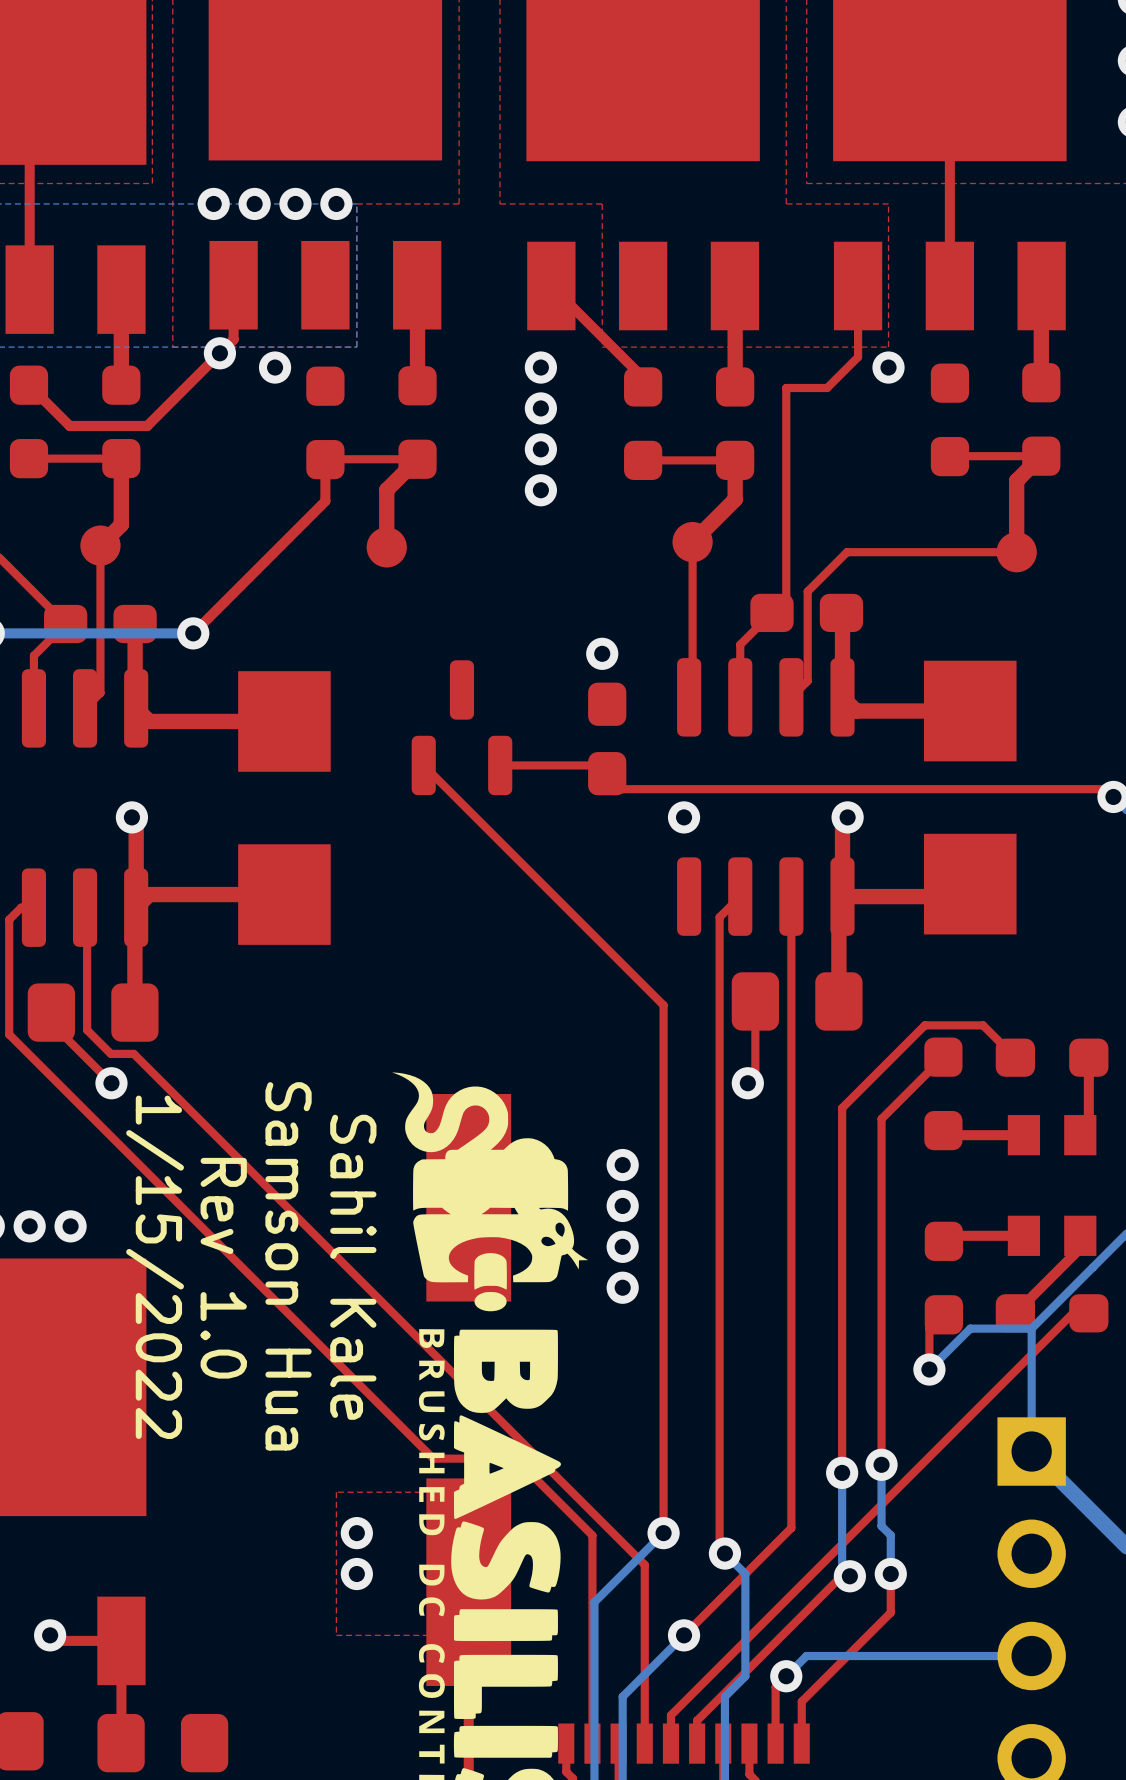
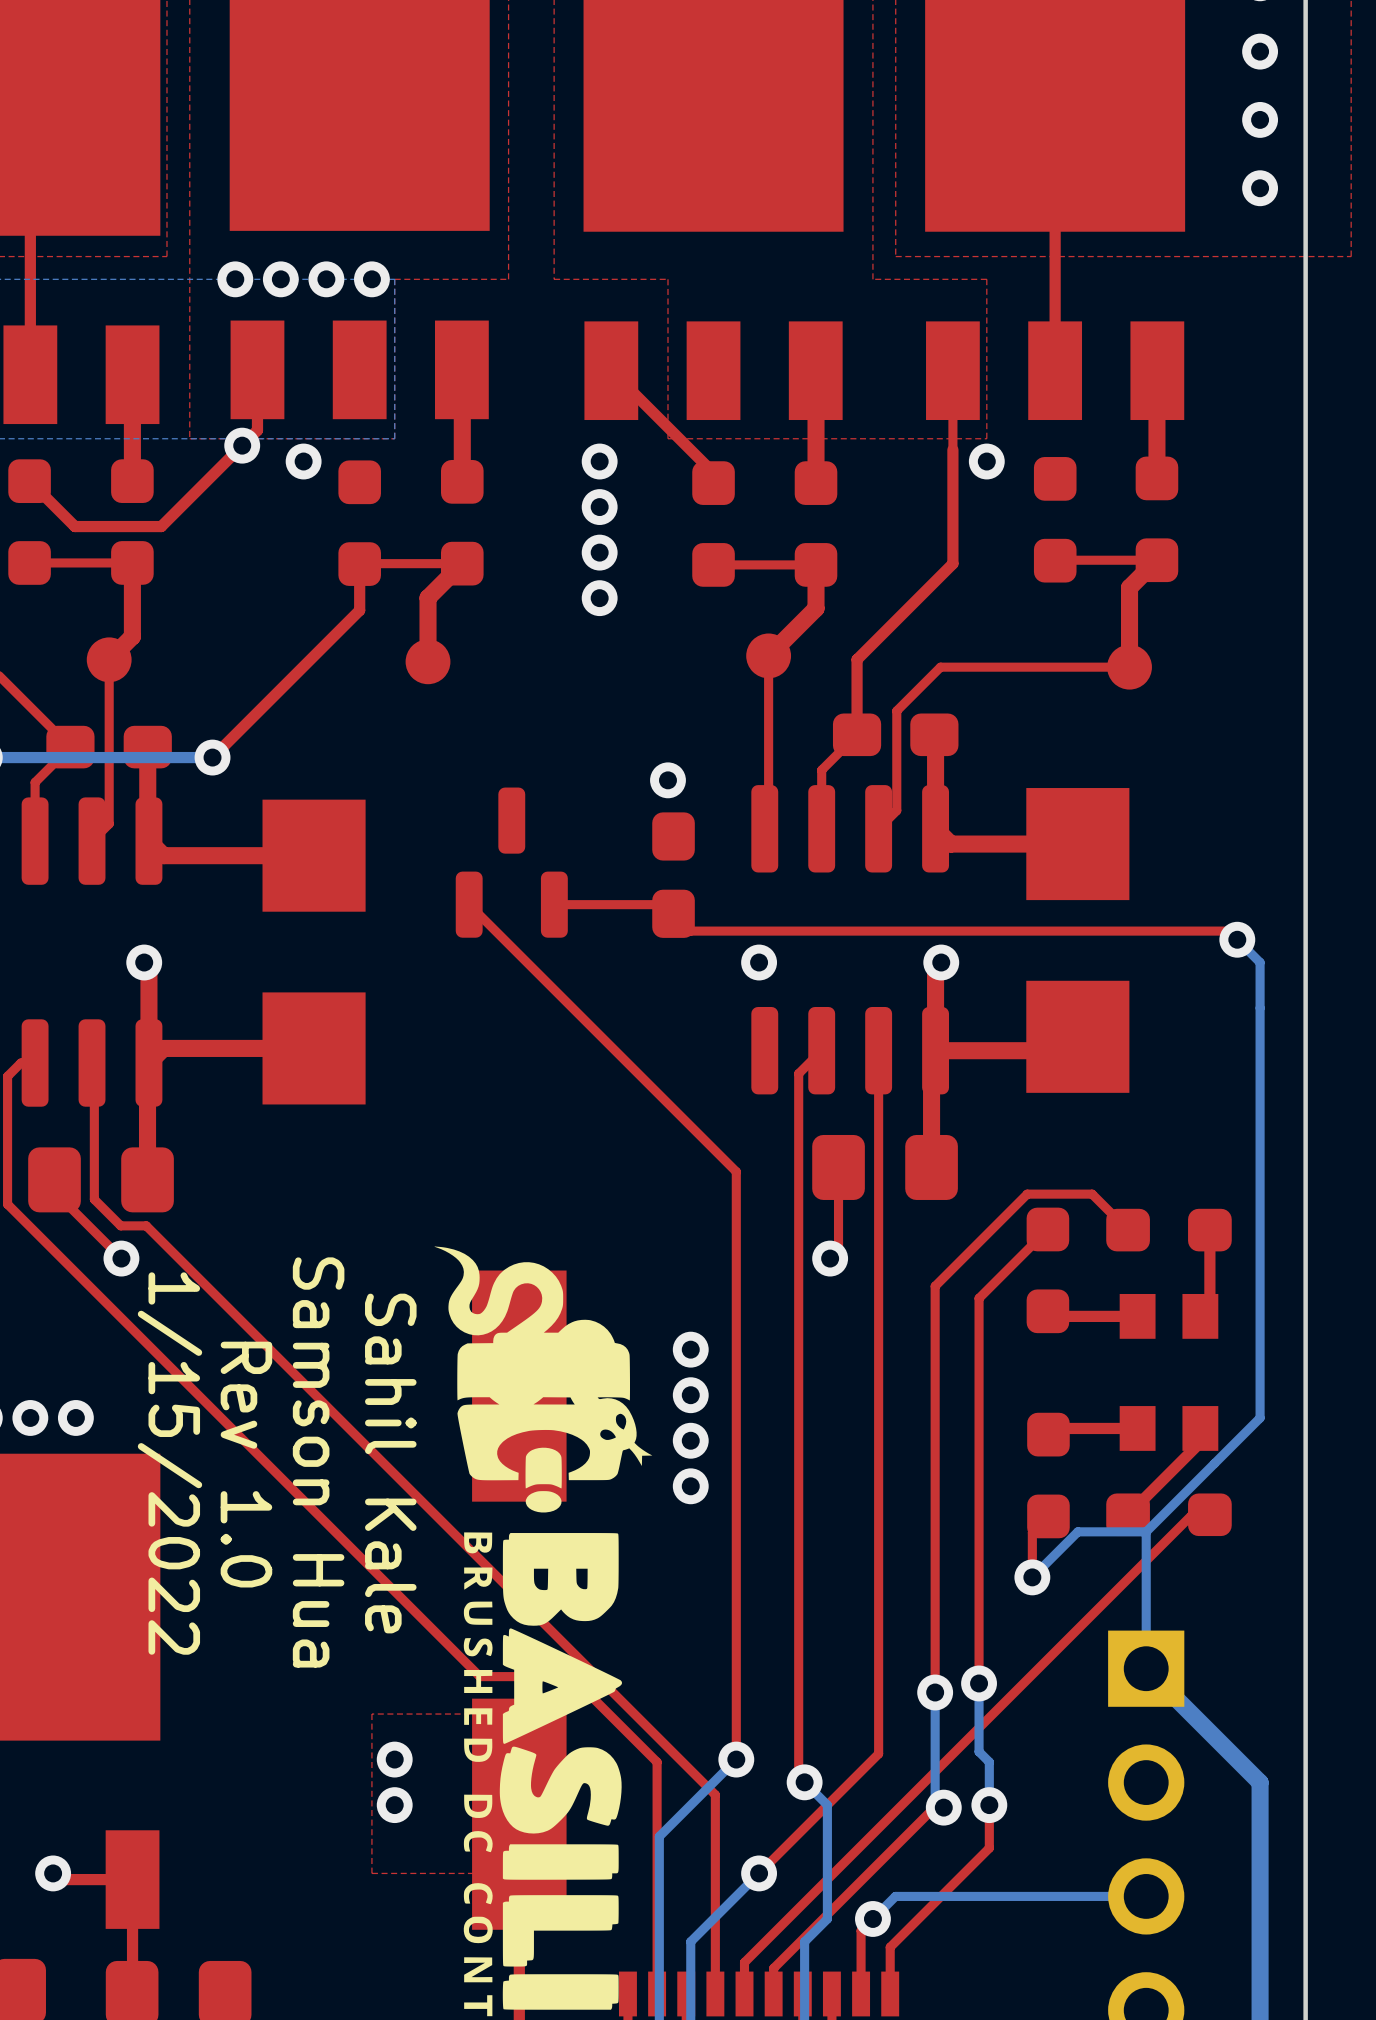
top track: (858, 357) (827, 387) (786, 387) (786, 610) -> (952, 449) (952, 563) (857, 659) (857, 734)

